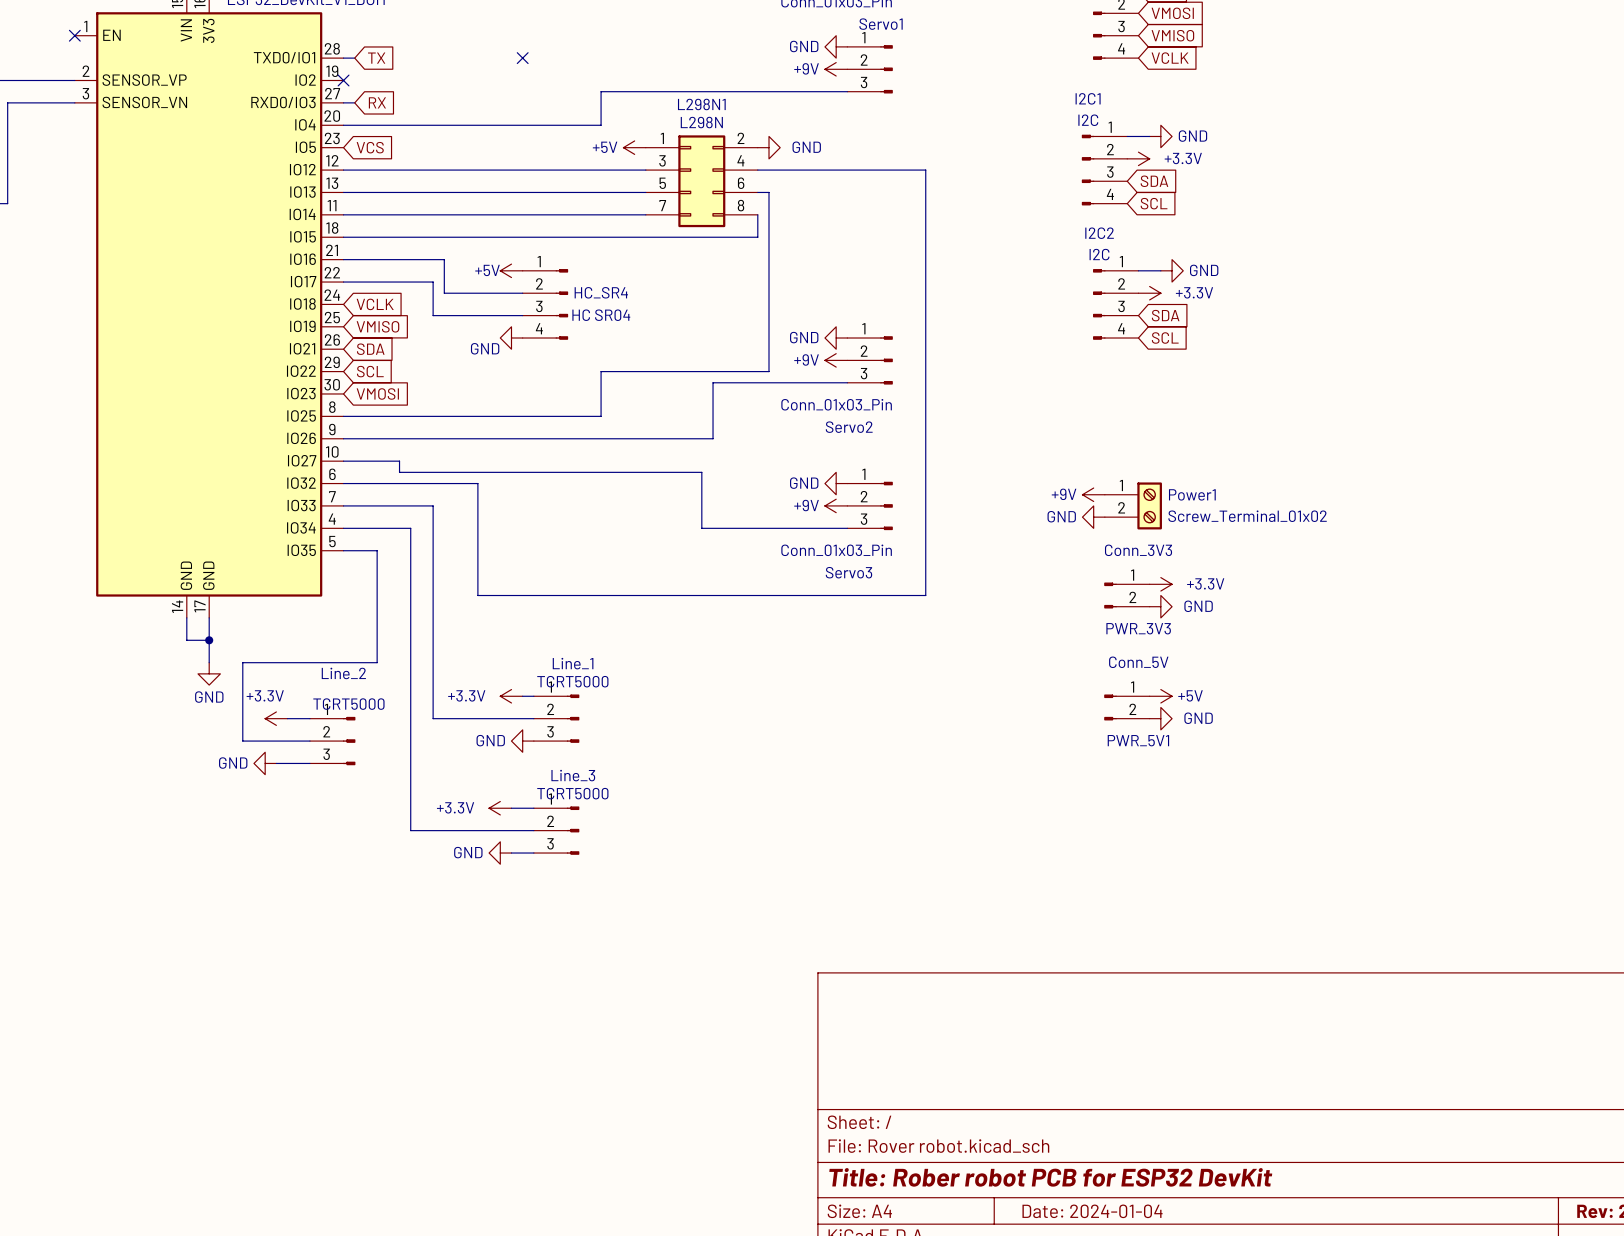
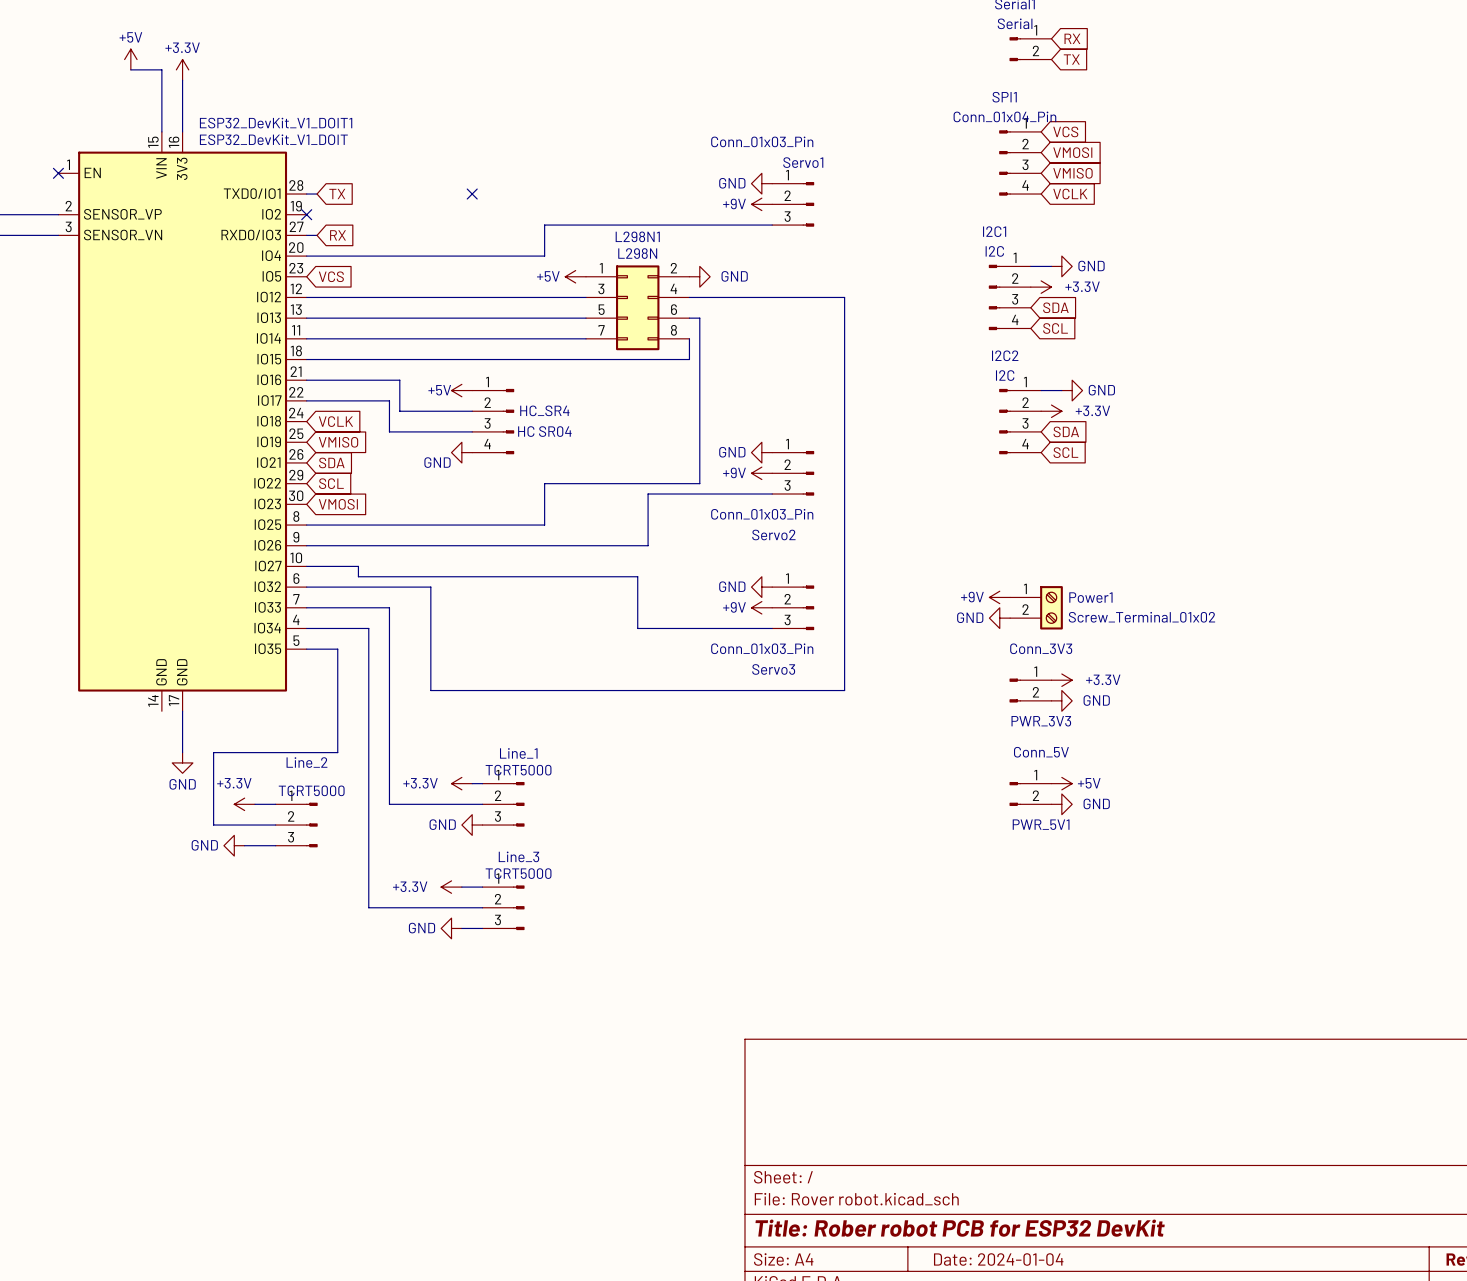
wire: (186, 617) (186, 640) (209, 640) -> none
junction: (209, 640) -> none

